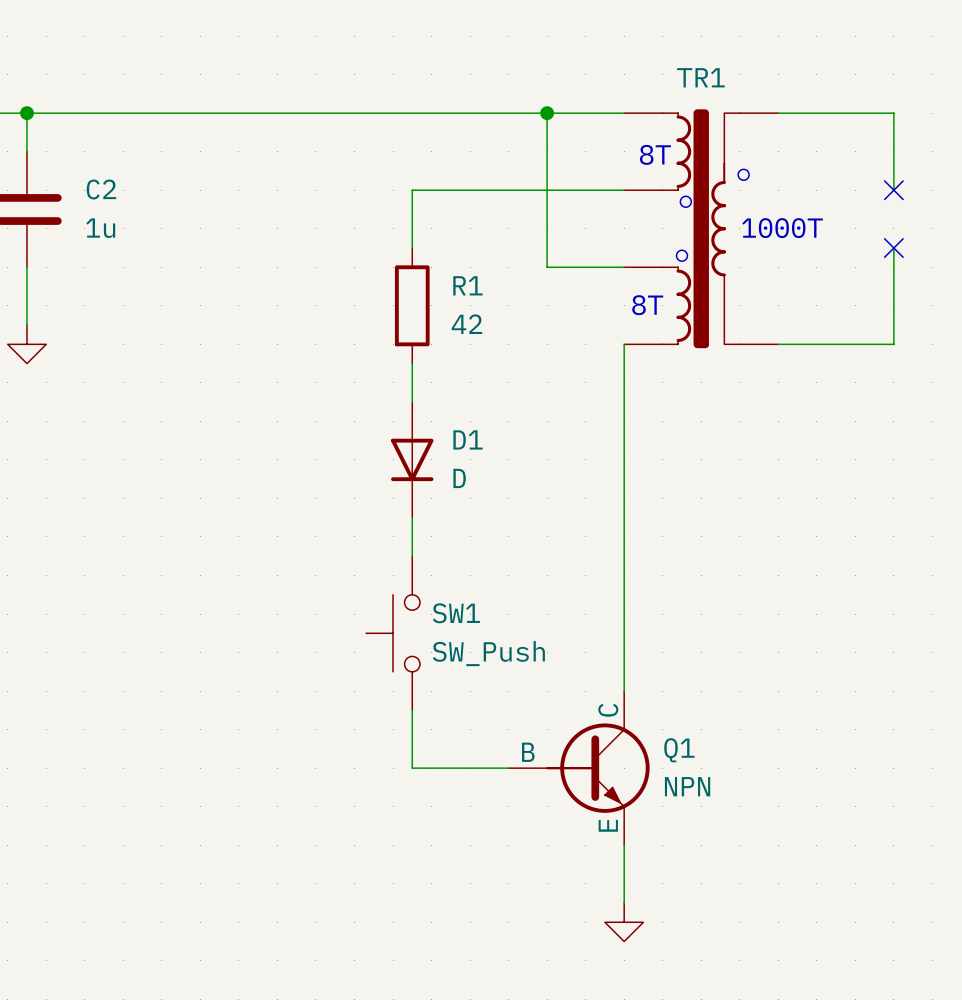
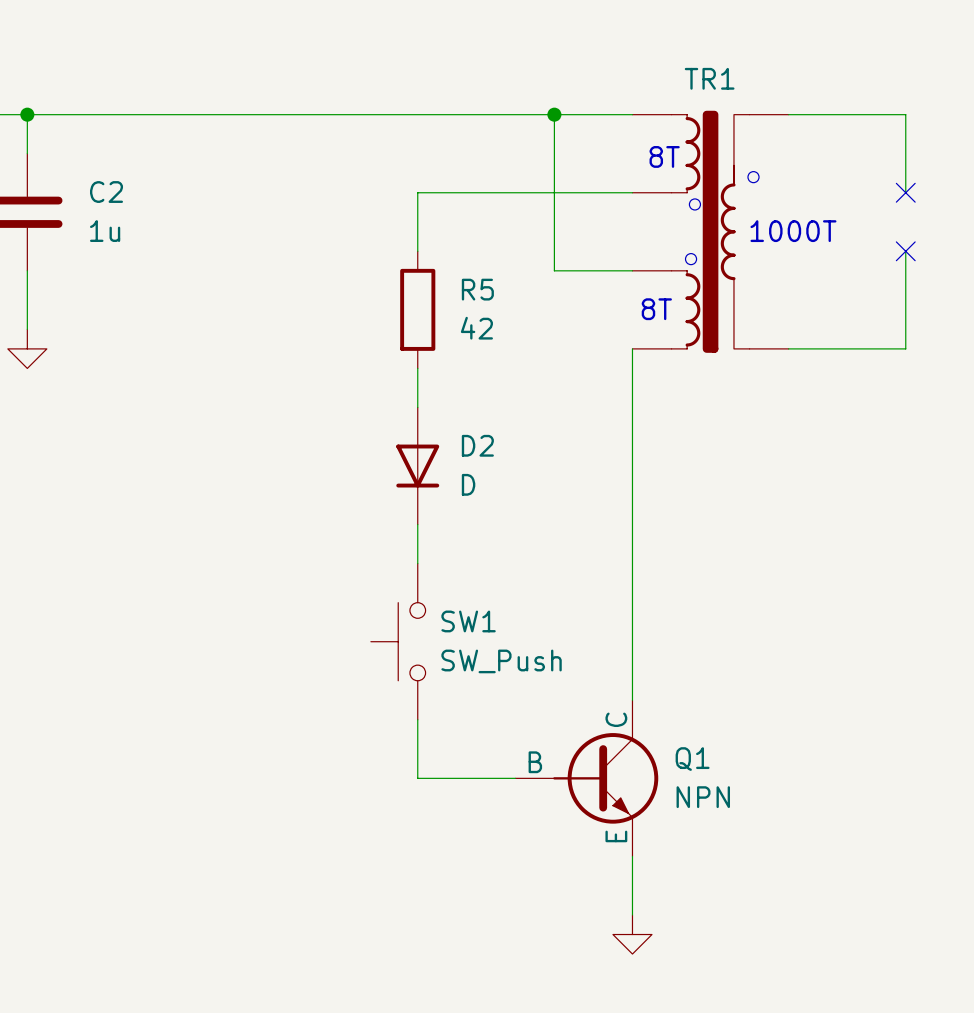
R1 name: R1 (467, 285) -> R5 (477, 289)
D1 name: D1 (468, 439) -> D2 (477, 445)

